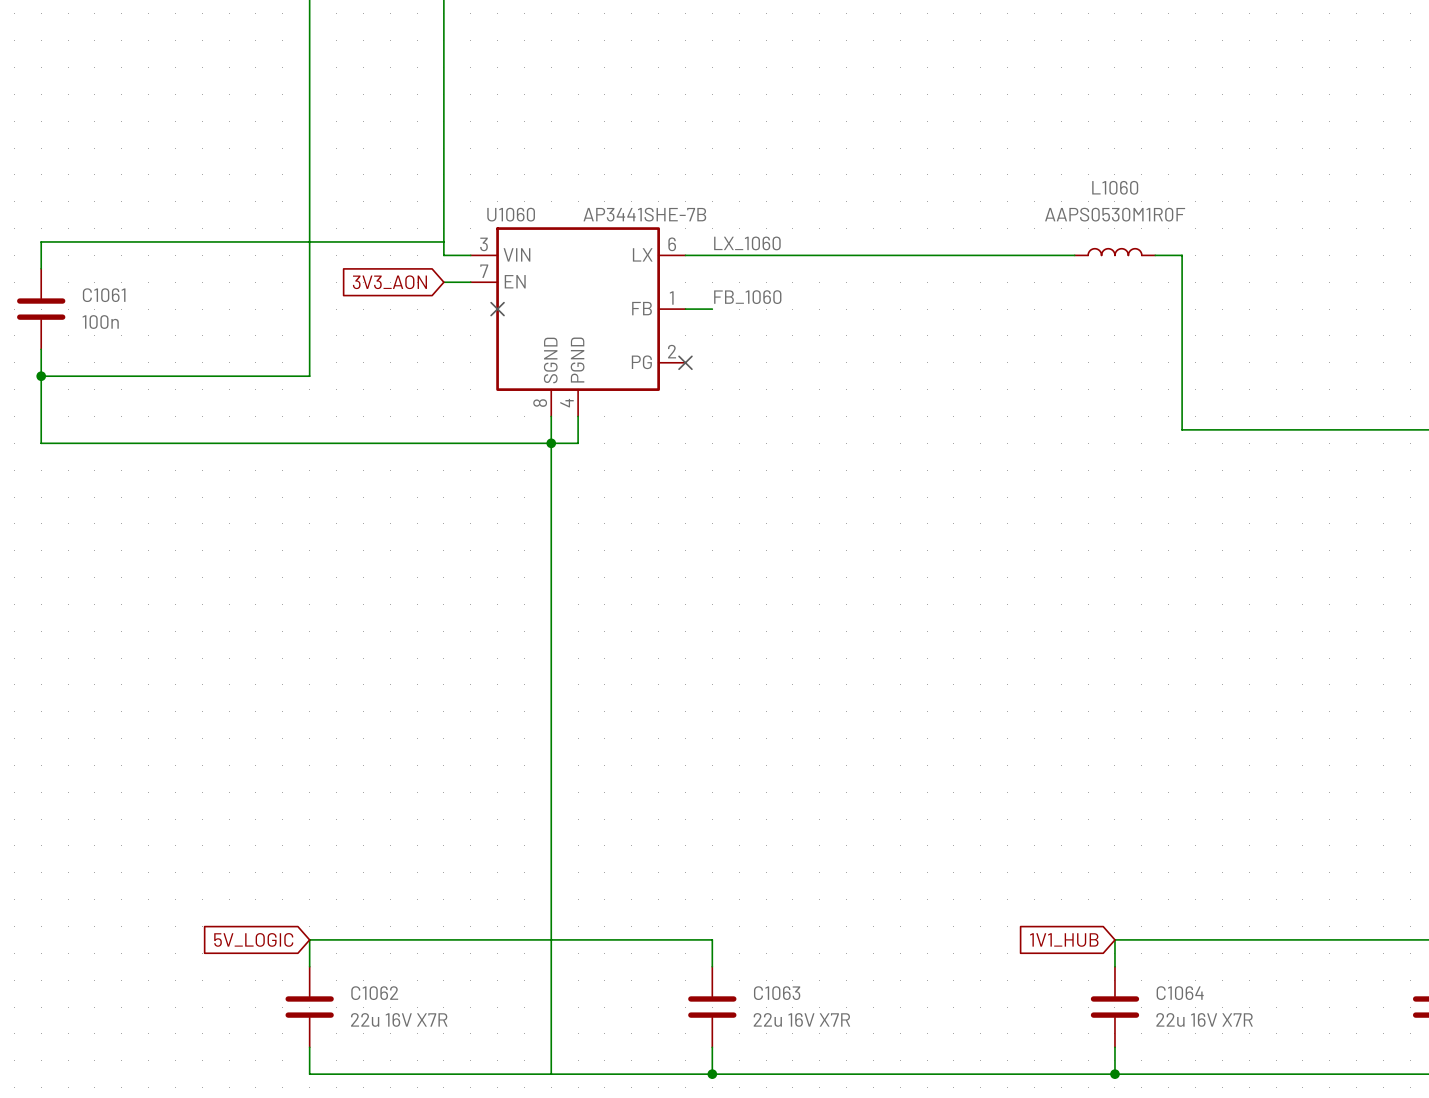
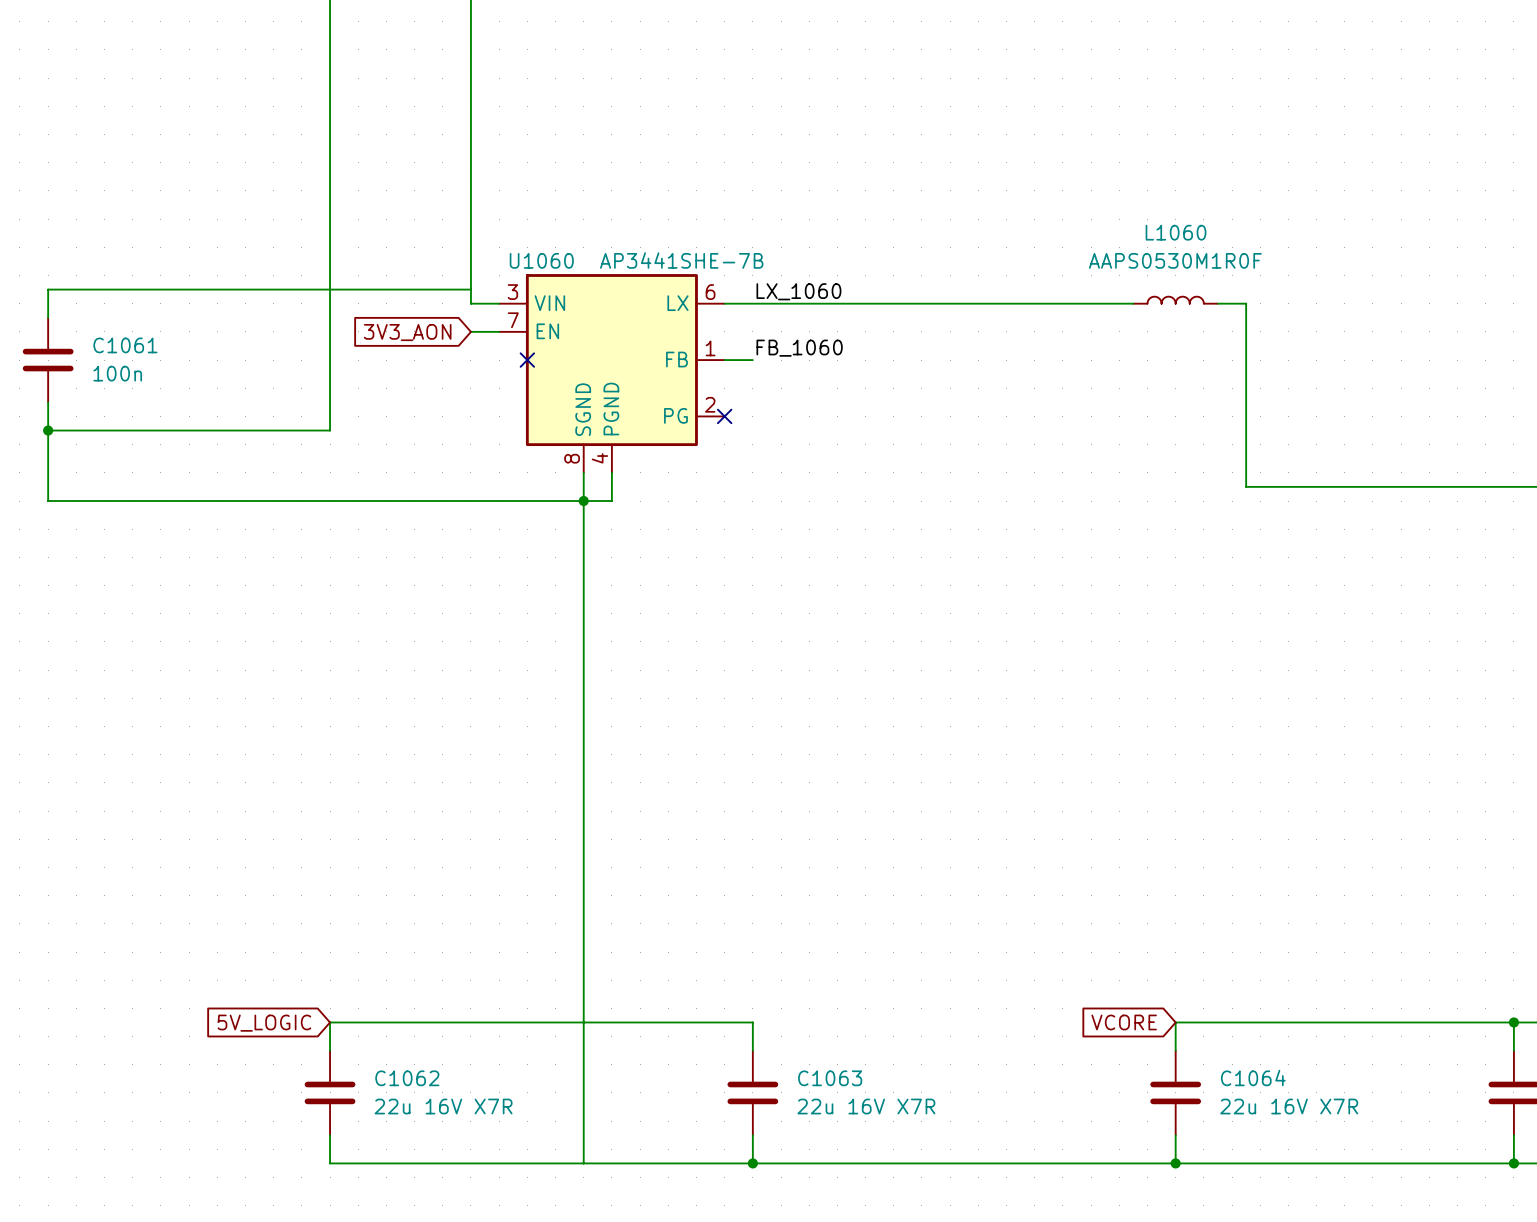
global label: 1V1_HUB (1064, 940) -> VCORE (1124, 1022)

